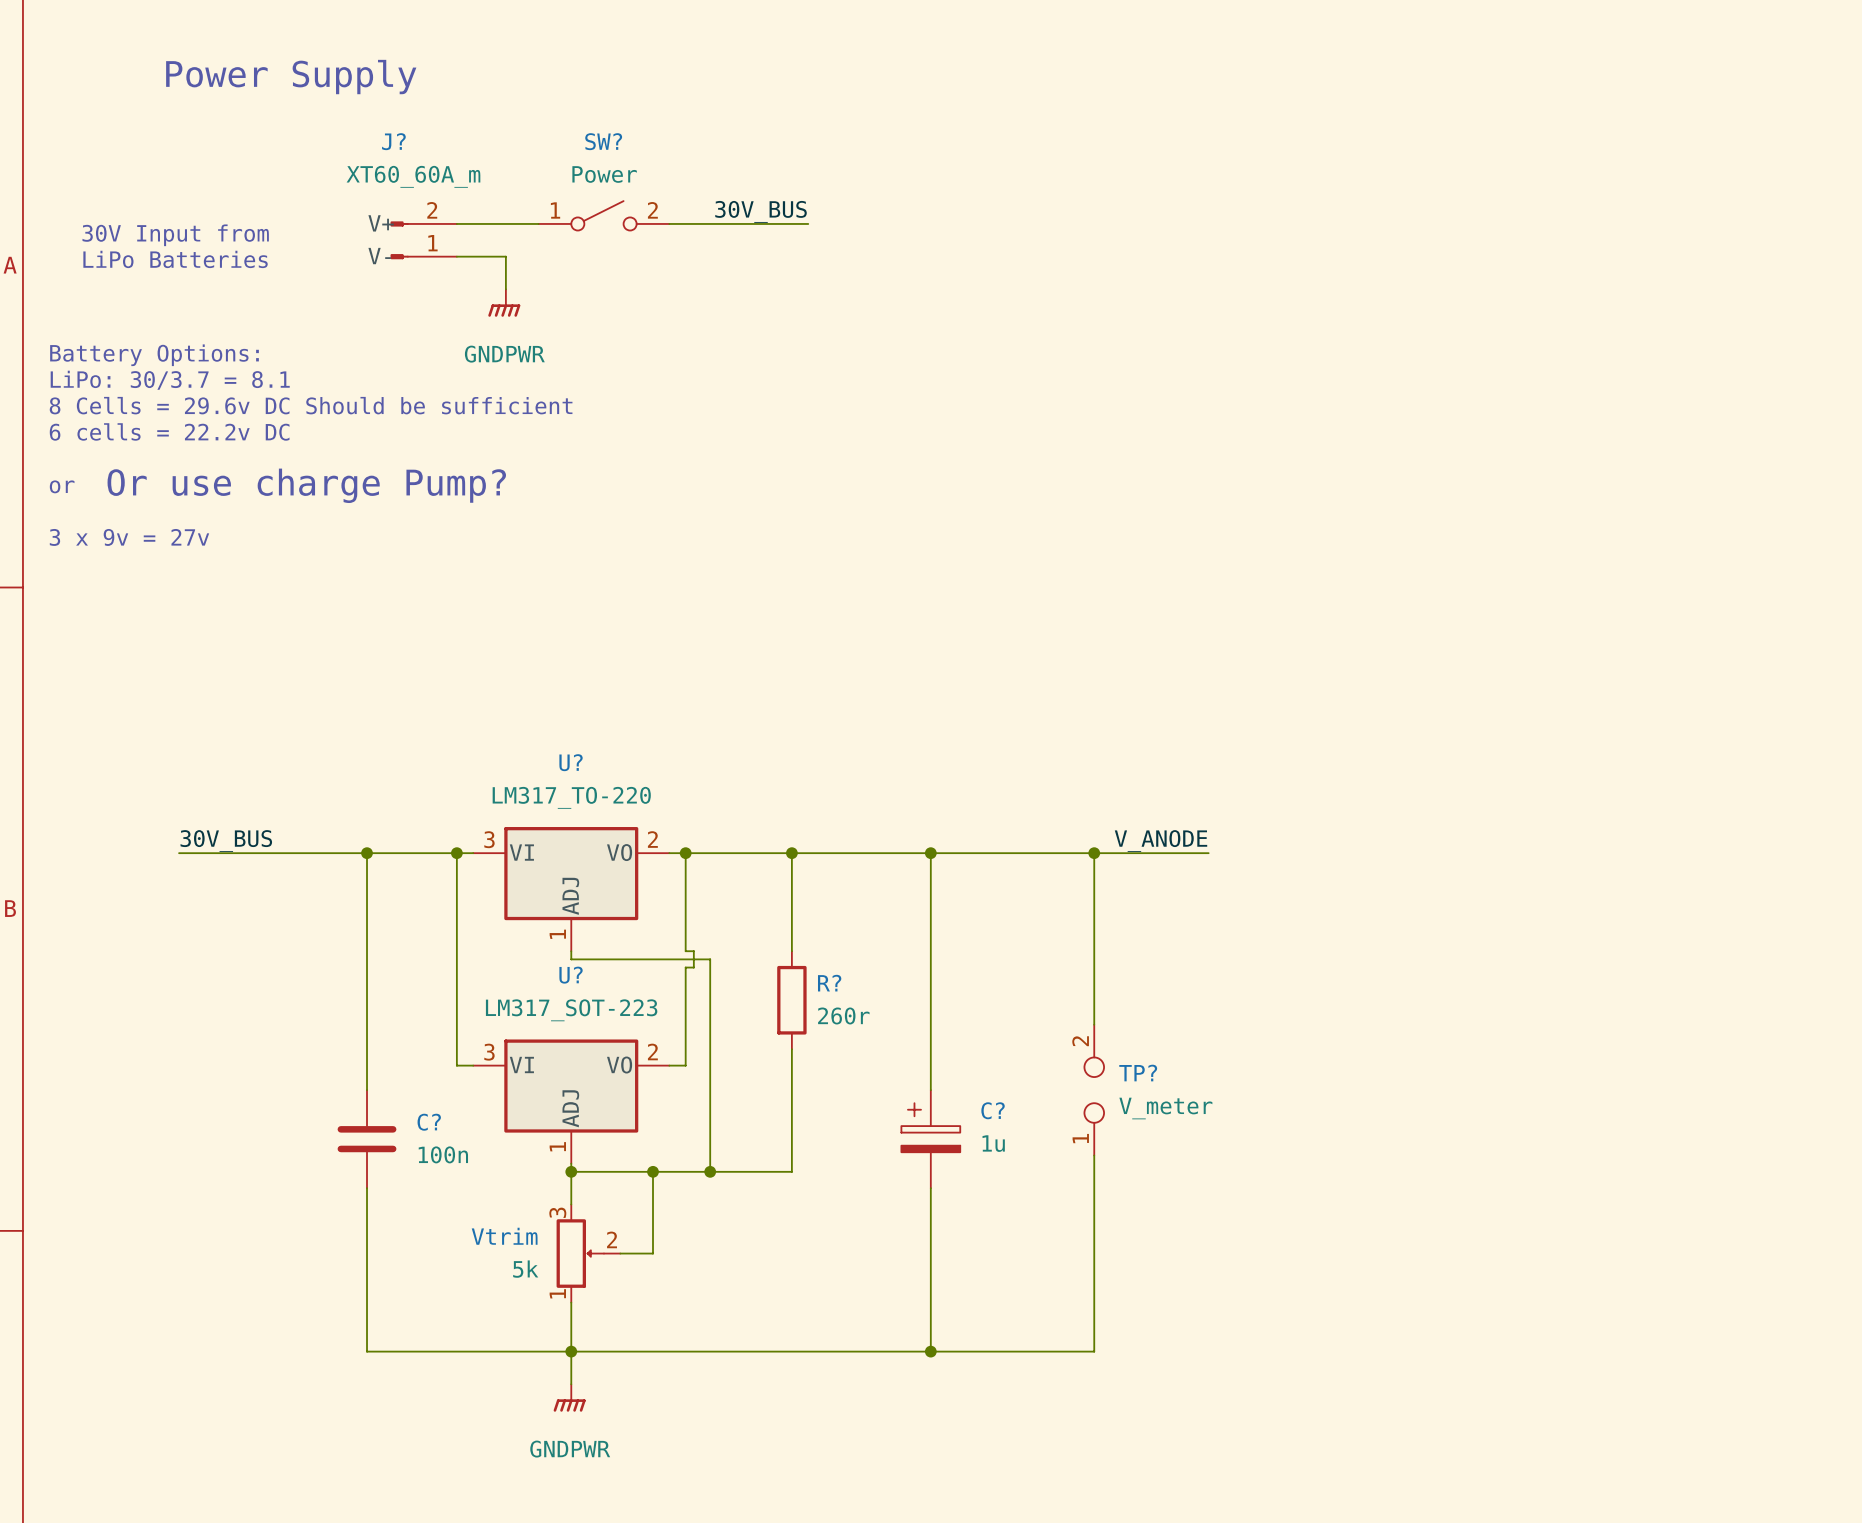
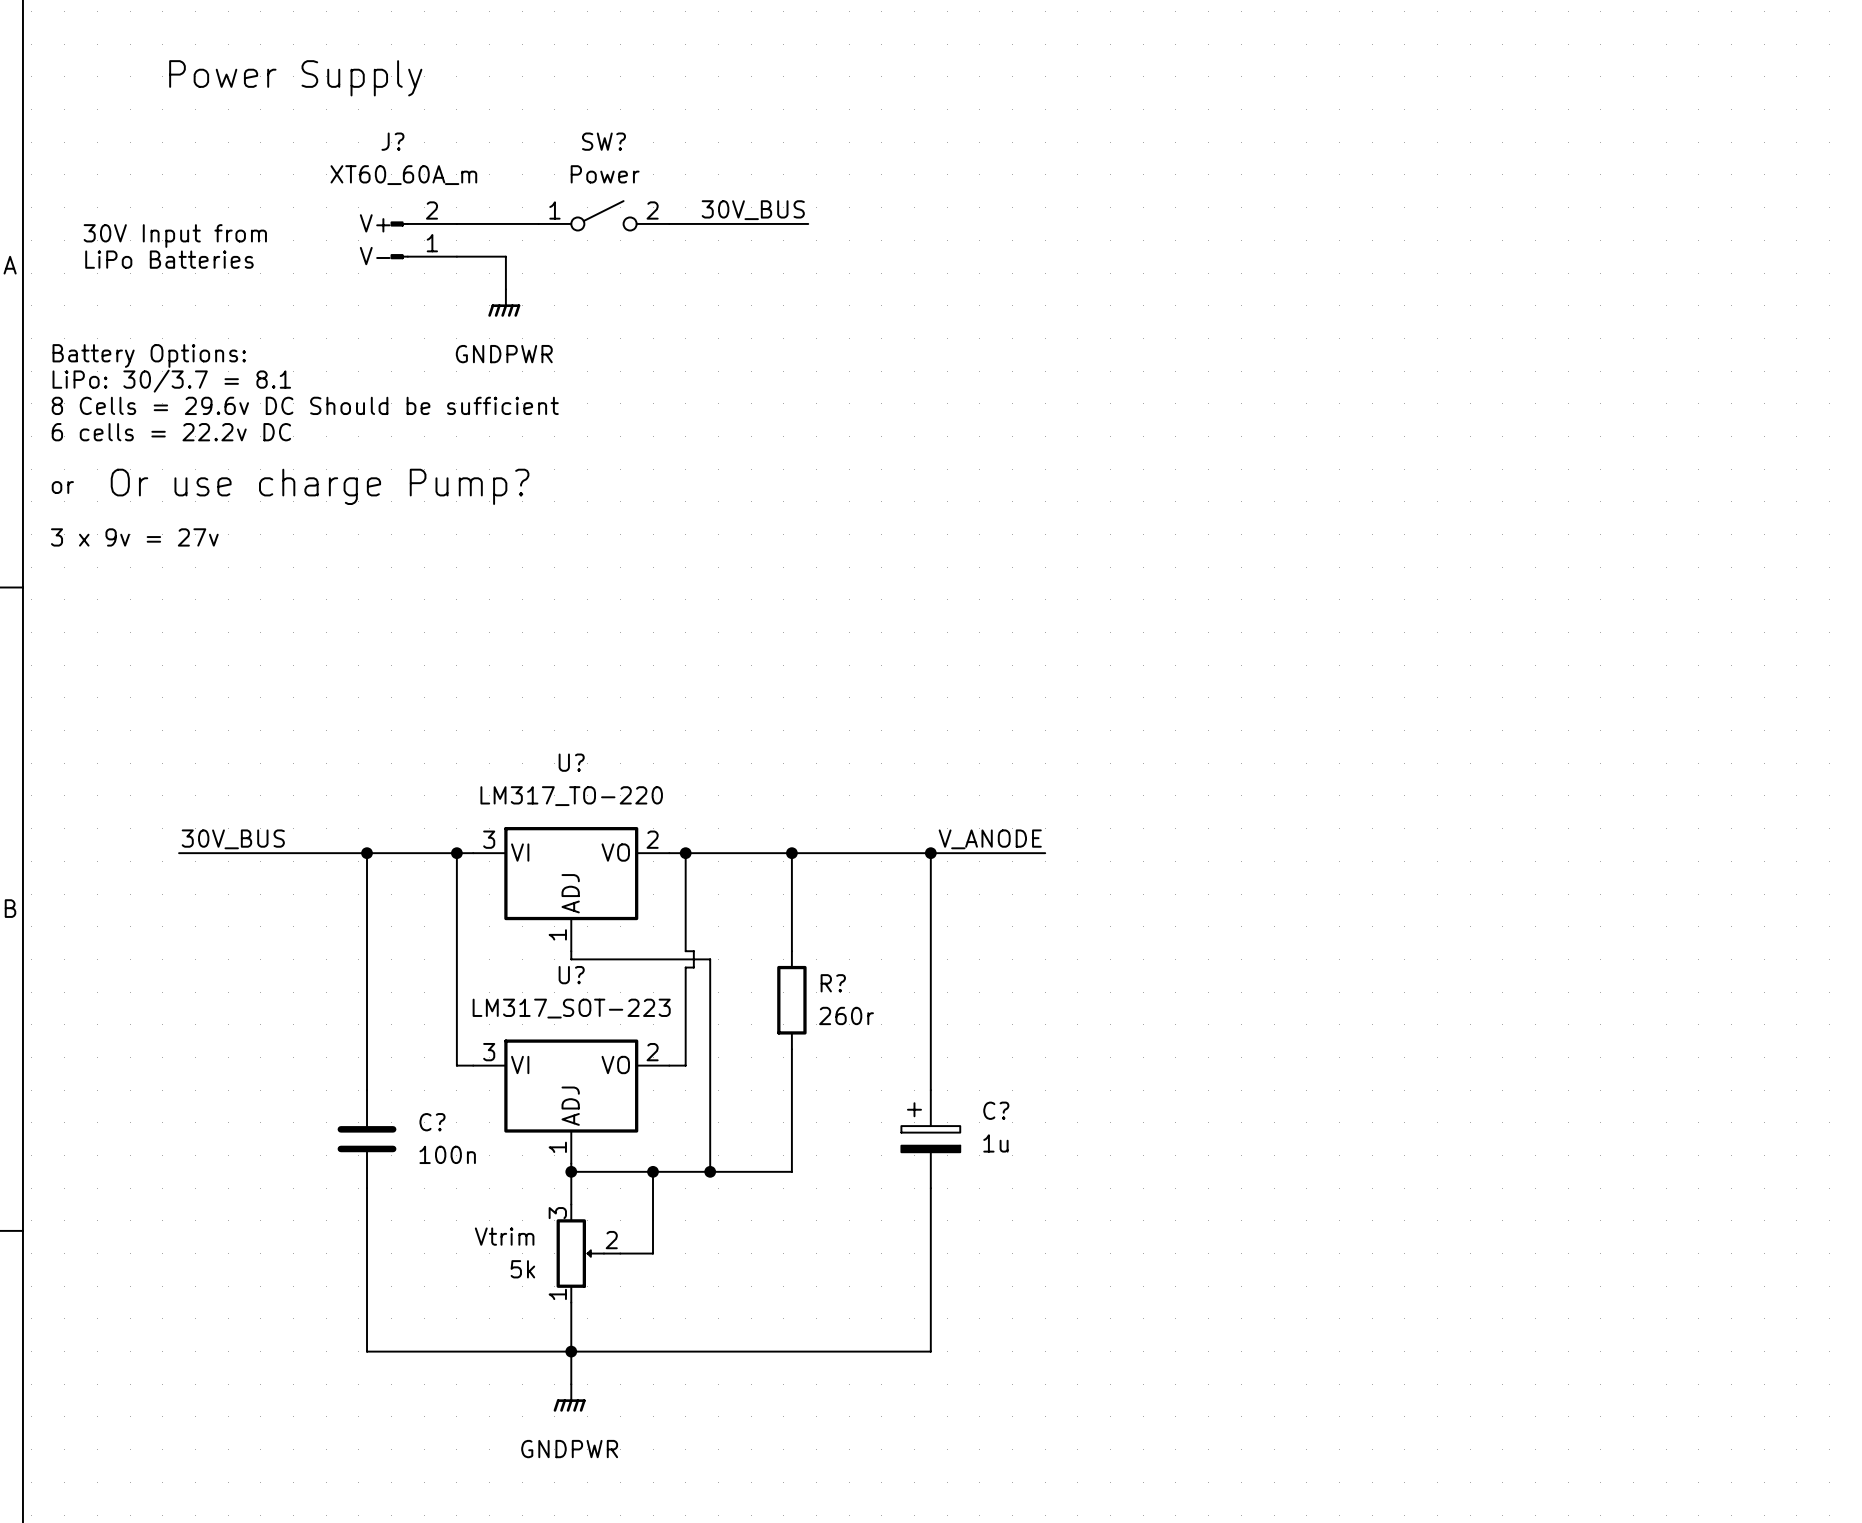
label position: V_ANODE (1161, 841) -> V_ANODE (990, 839)
wire: (1045, 853) (1208, 853) -> none
wire: (1094, 853) (1094, 1024) -> none
junction: (1094, 853) -> none
TP?: V_meter (1094, 1090) -> none
wire: (1094, 1155) (1094, 1351) (930, 1351) -> none
junction: (930, 1351) -> none

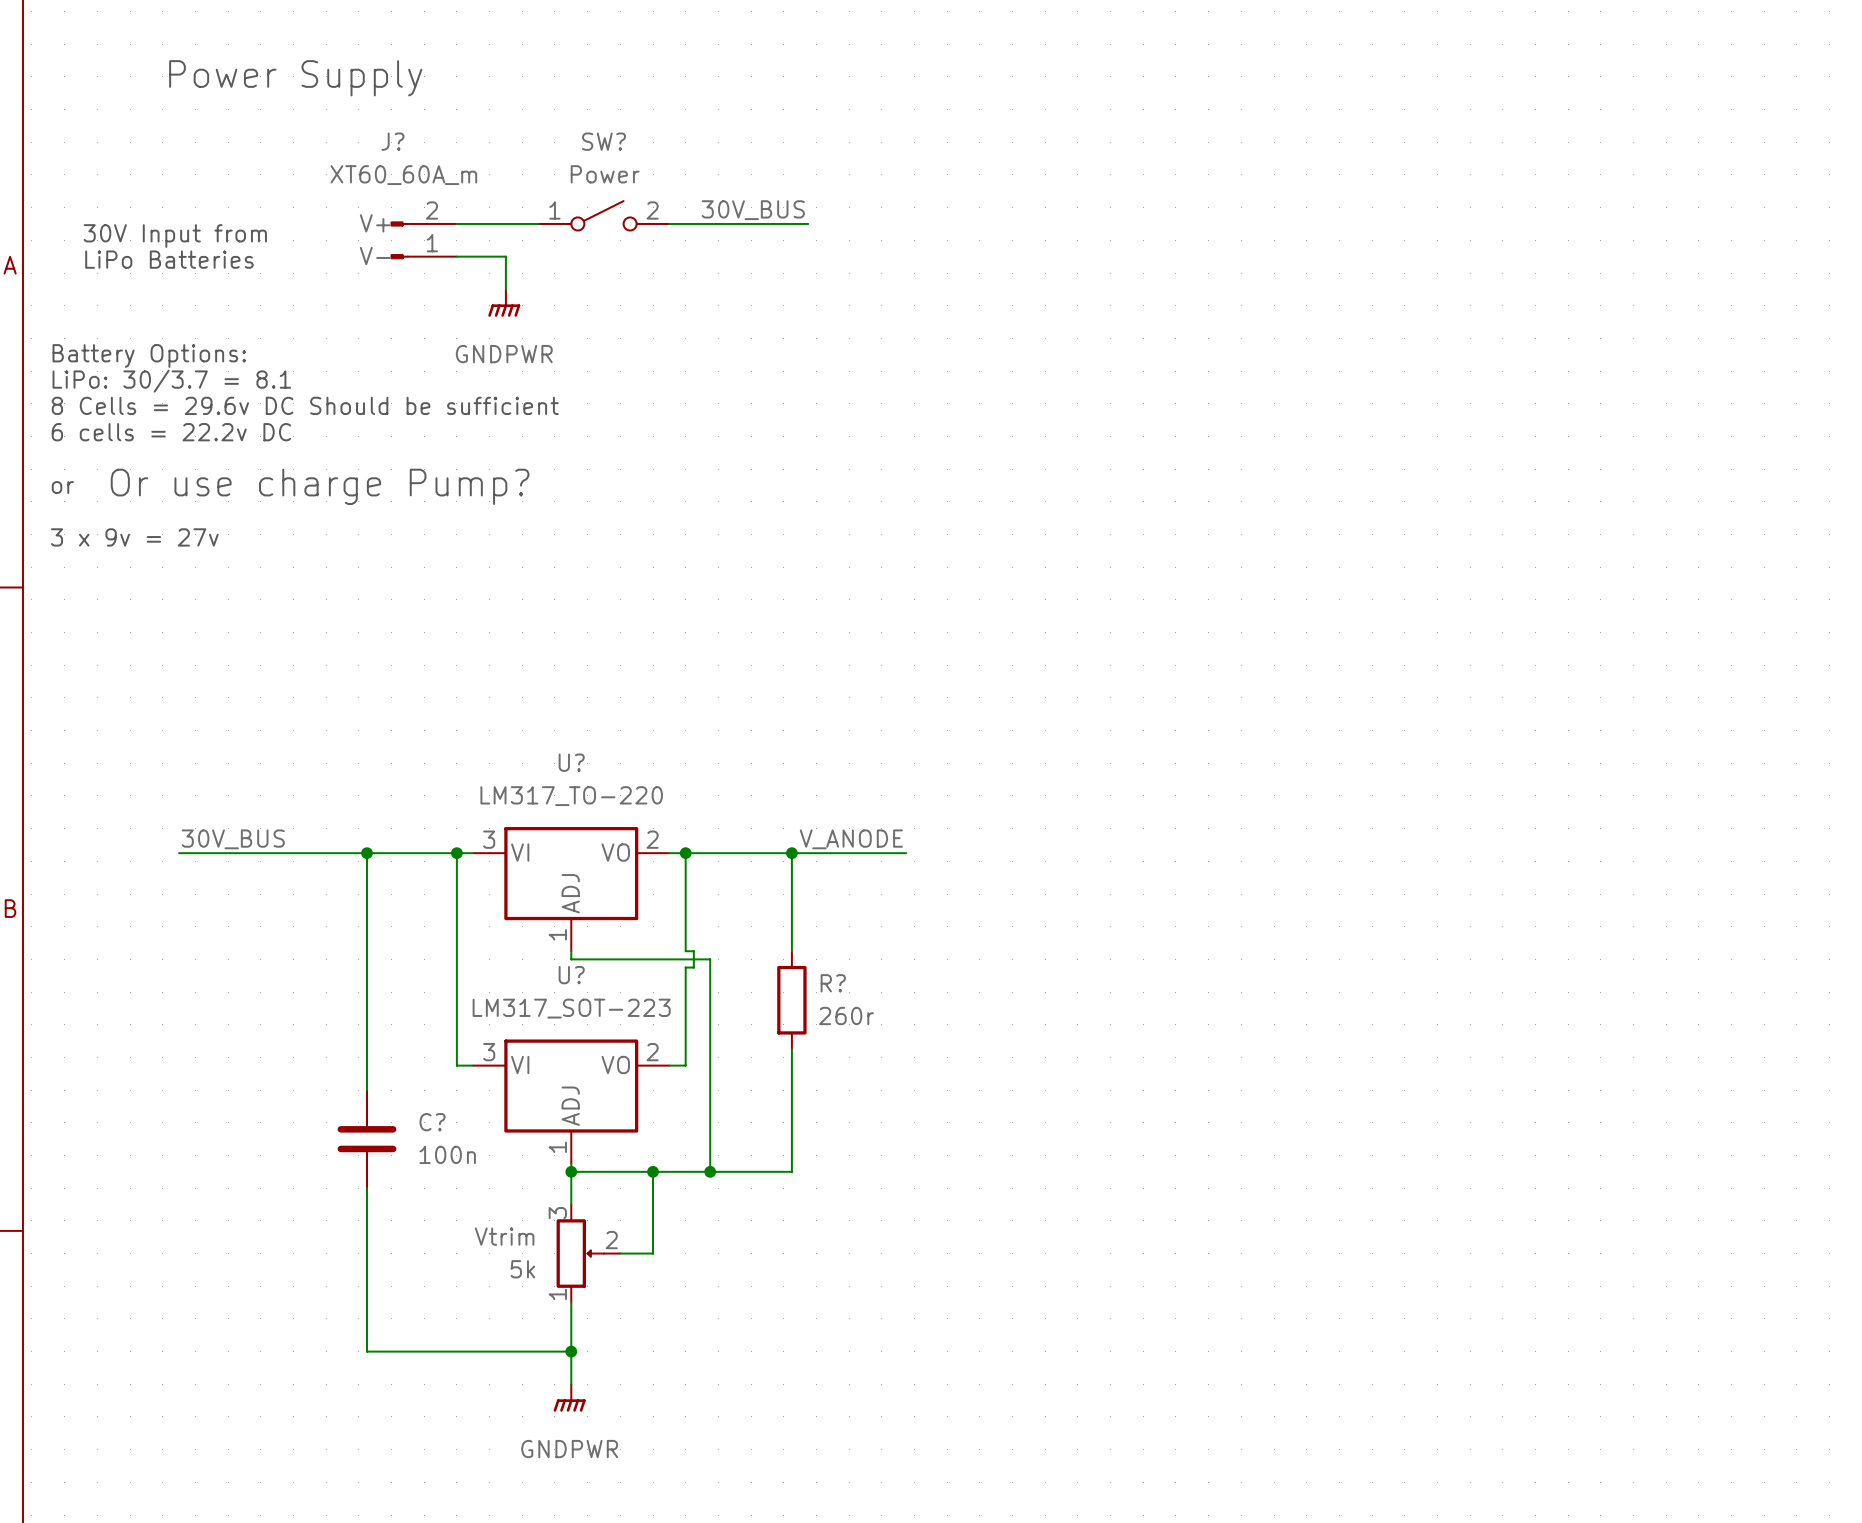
label position: V_ANODE (990, 839) -> V_ANODE (851, 839)
wire: (906, 853) (1045, 853) -> none
wire: (930, 853) (930, 1090) -> none
junction: (930, 853) -> none
C?: 1u (930, 1139) -> none
wire: (930, 1188) (930, 1351) (571, 1351) -> none

